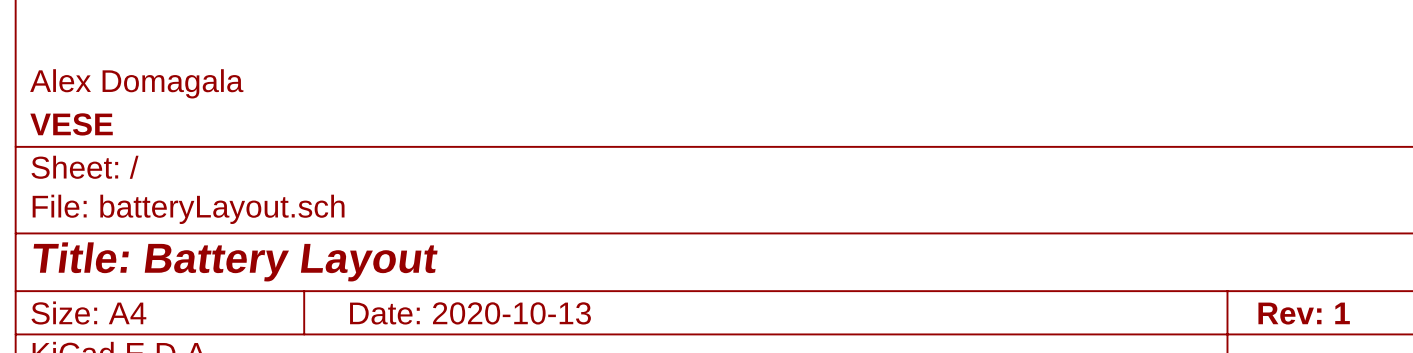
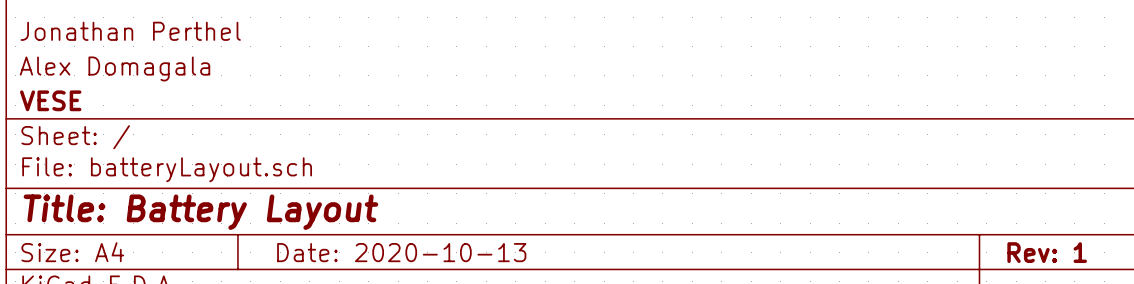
title block: none -> Jonathan Perthel (130, 31)

